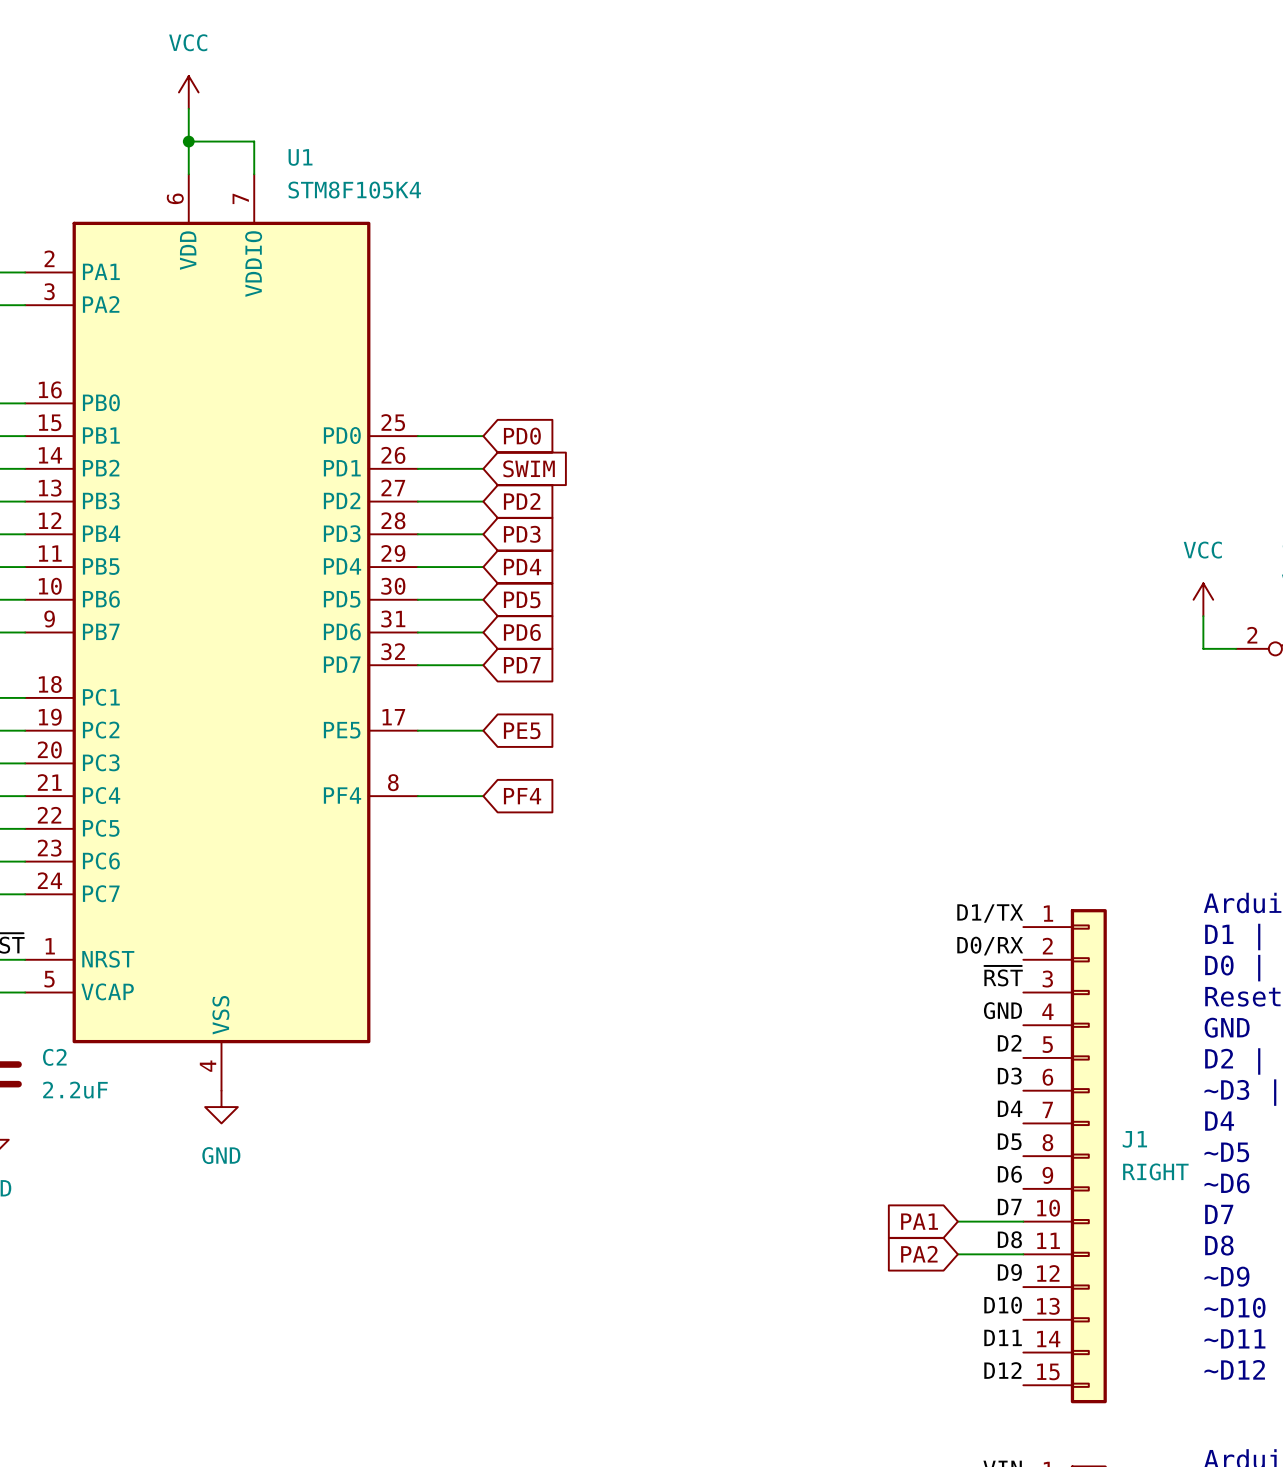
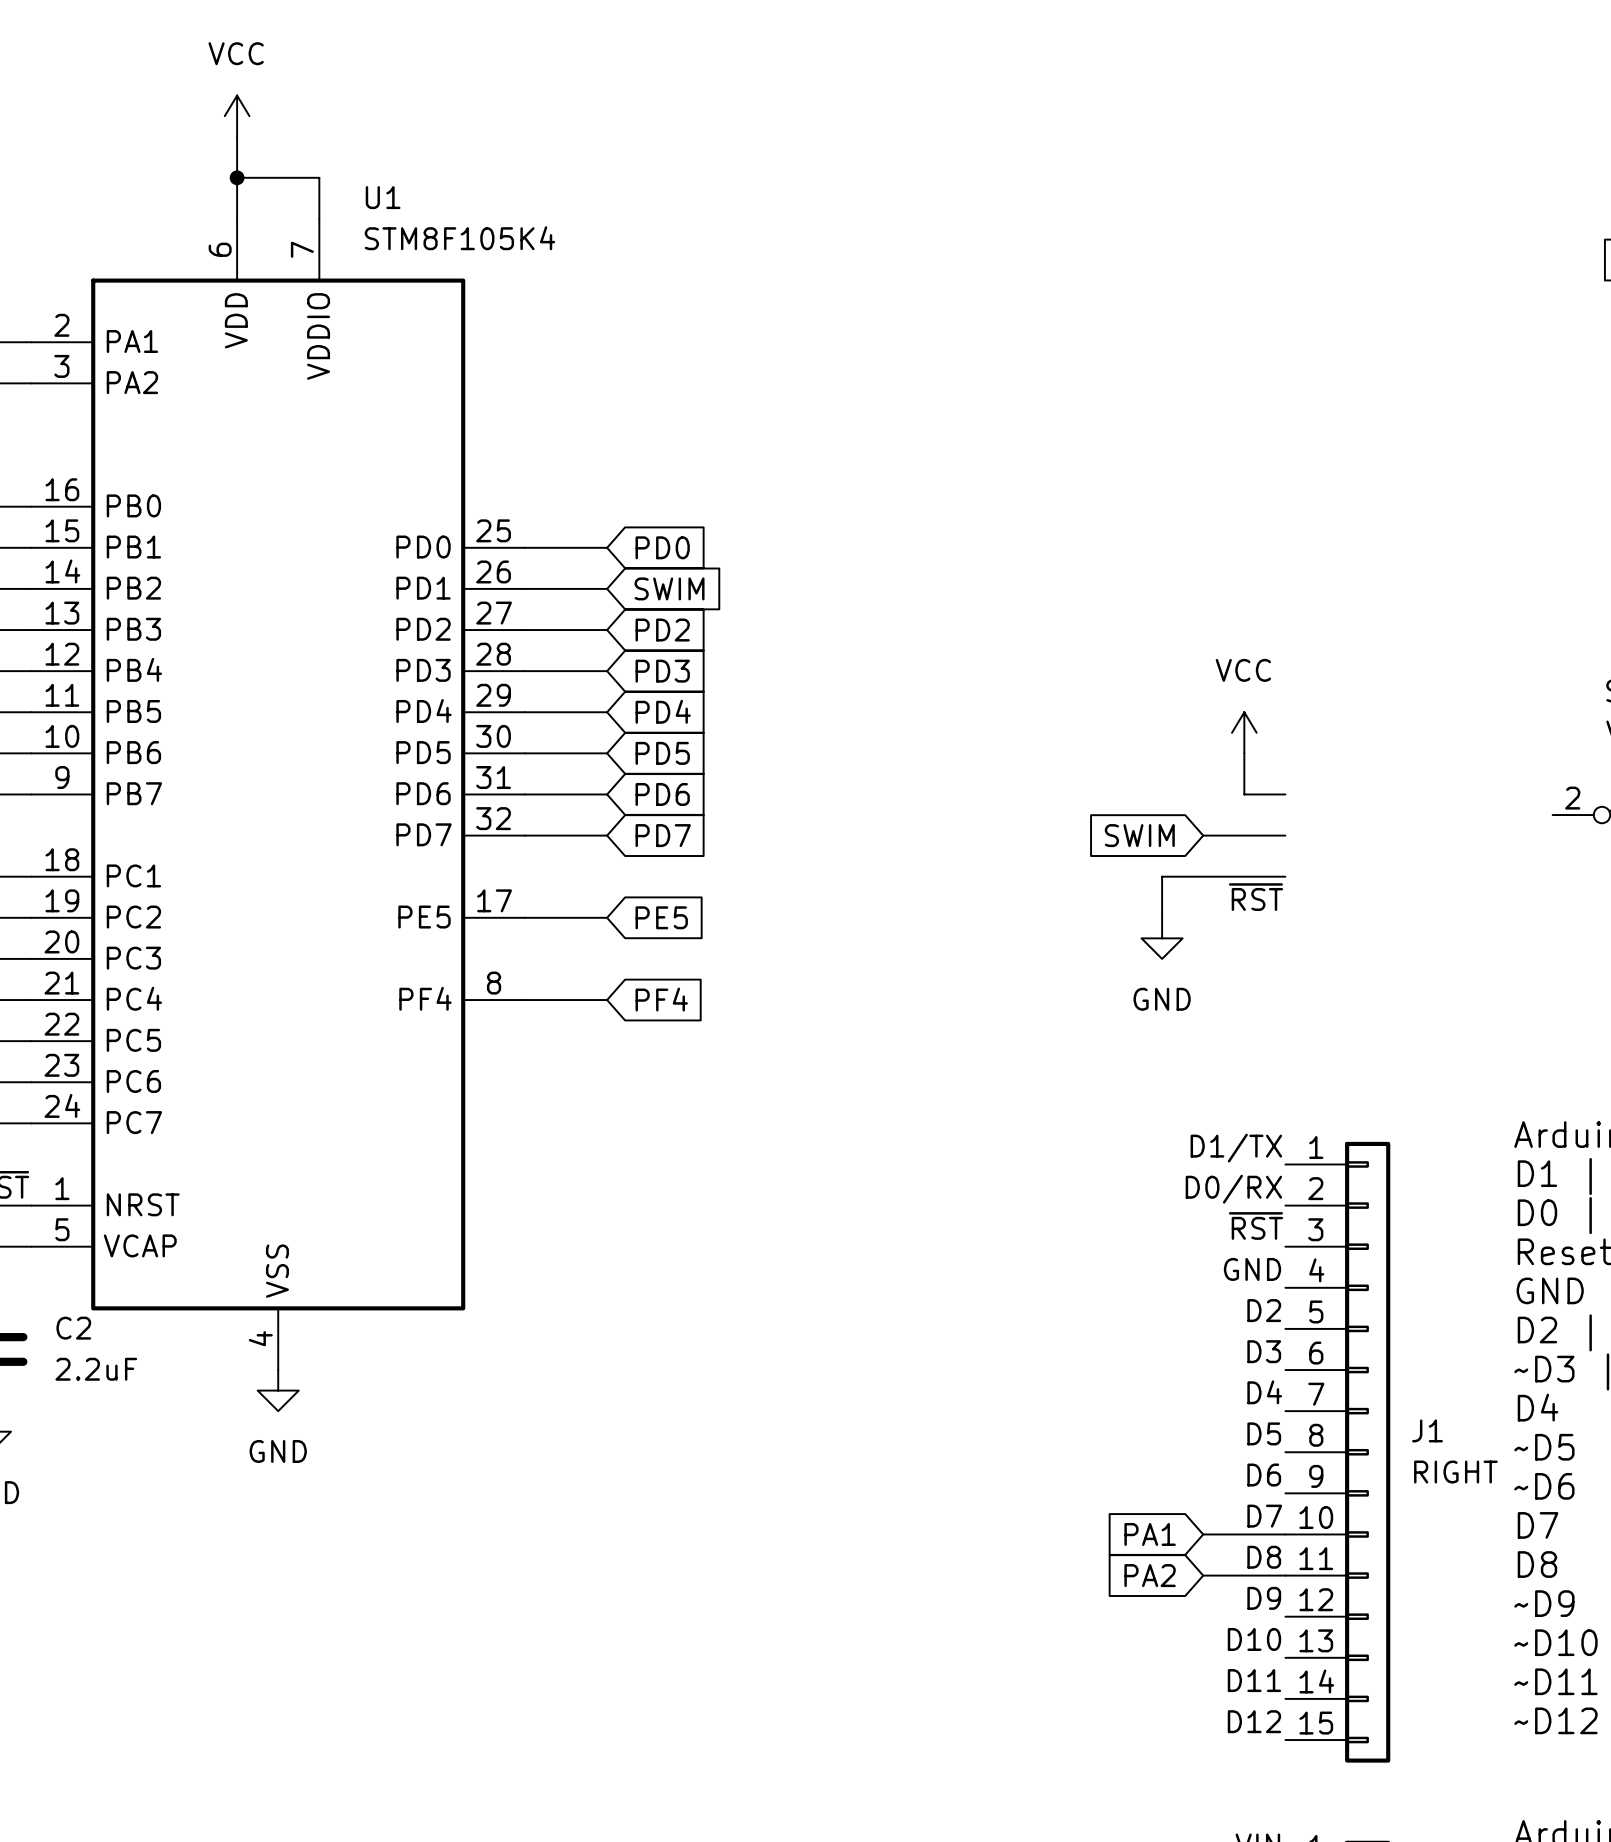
power symbol position: VCC (1203, 599) -> VCC (1244, 732)
wire: (1203, 616) (1203, 648) (1236, 648) -> (1244, 753) (1244, 794) (1285, 794)
global label: none -> SWIM (1139, 835)
wire: none -> (1203, 835) (1285, 835)
wire: none -> (1285, 876) (1162, 876) (1162, 917)
label: none -> ~{RST} (1255, 897)
power symbol: none -> GND (1162, 938)

